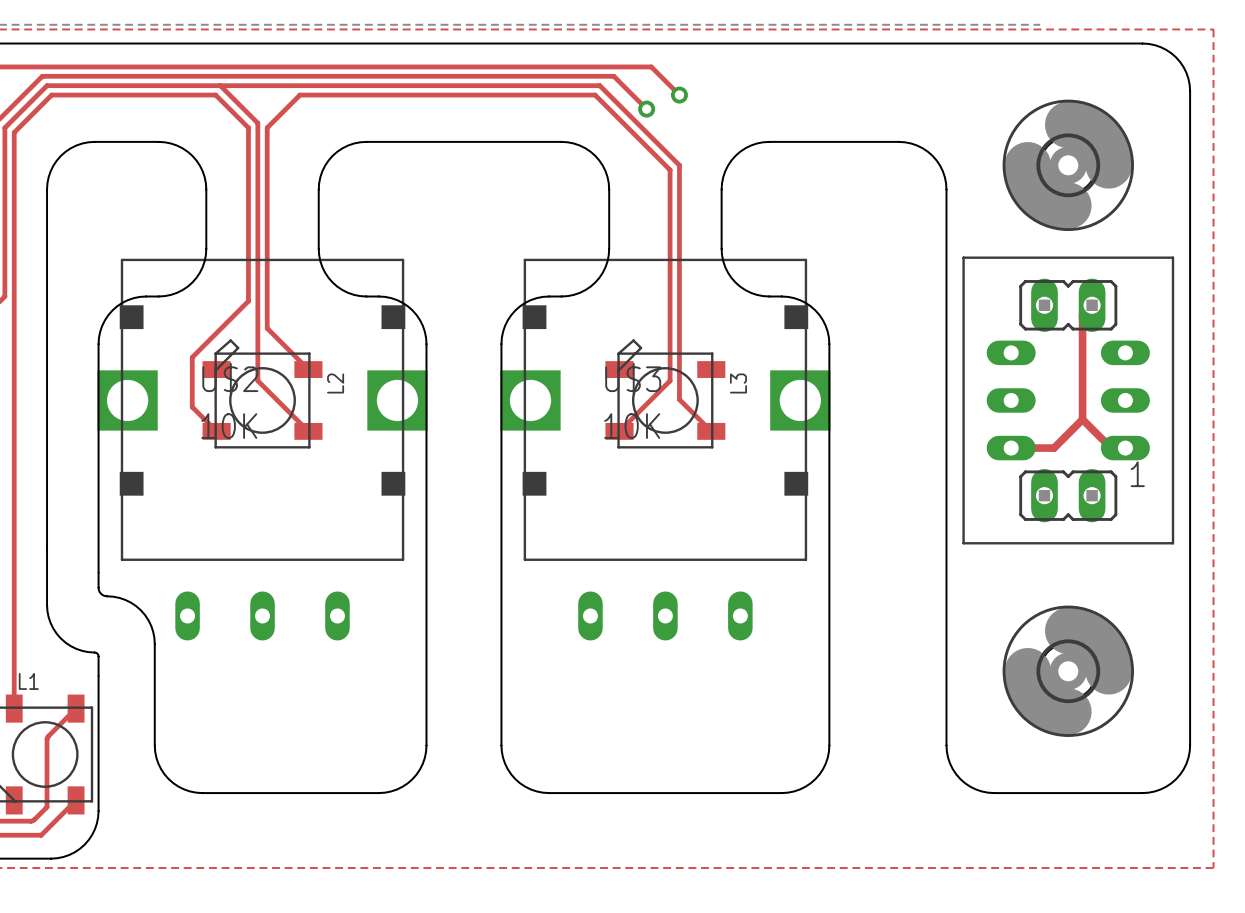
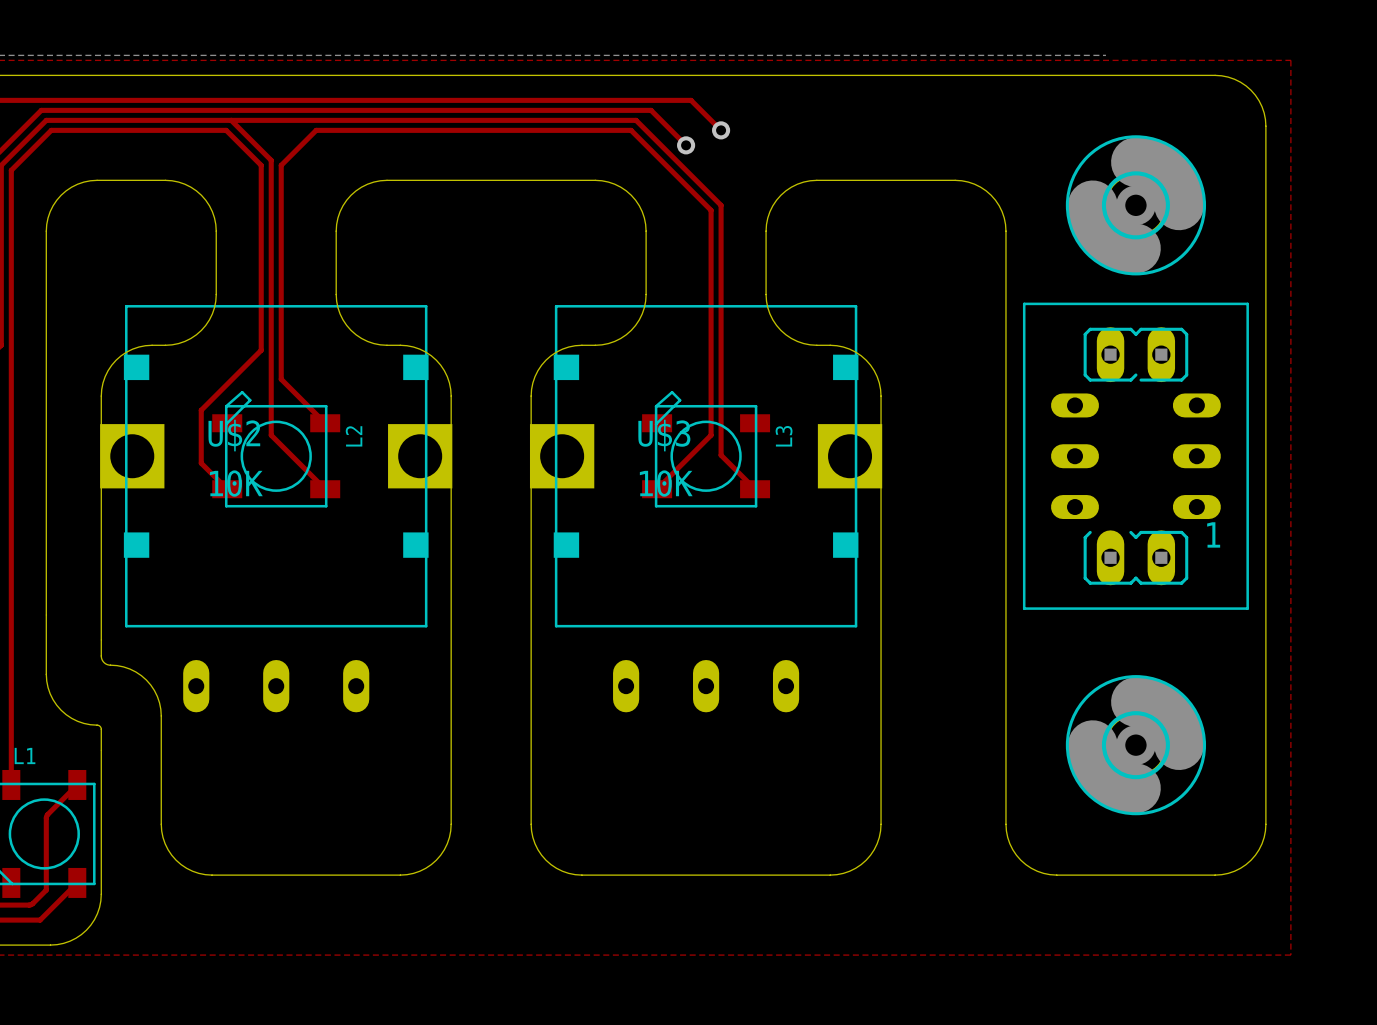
part footprint: [962, 256, 1175, 545] -> [1022, 302, 1249, 610]

